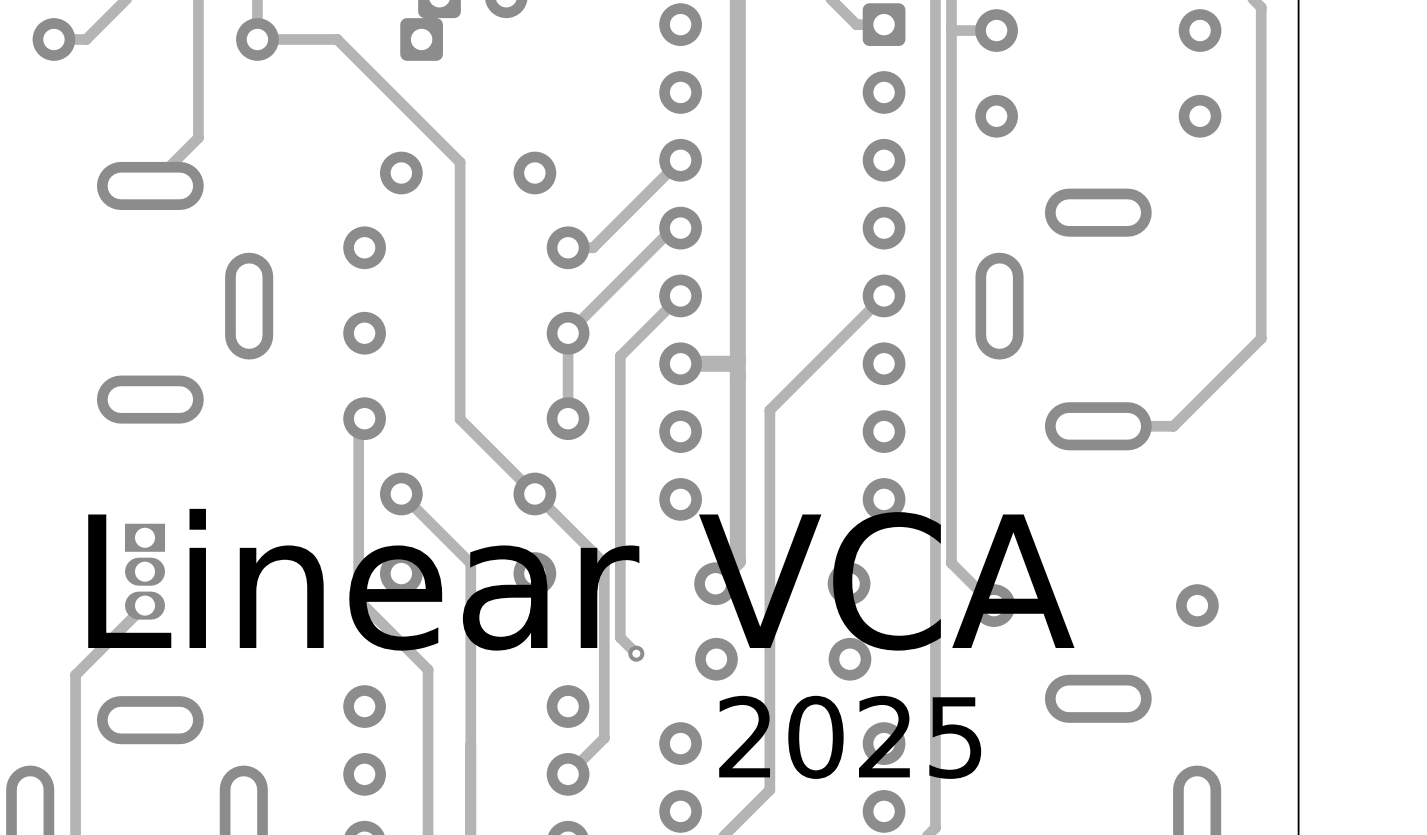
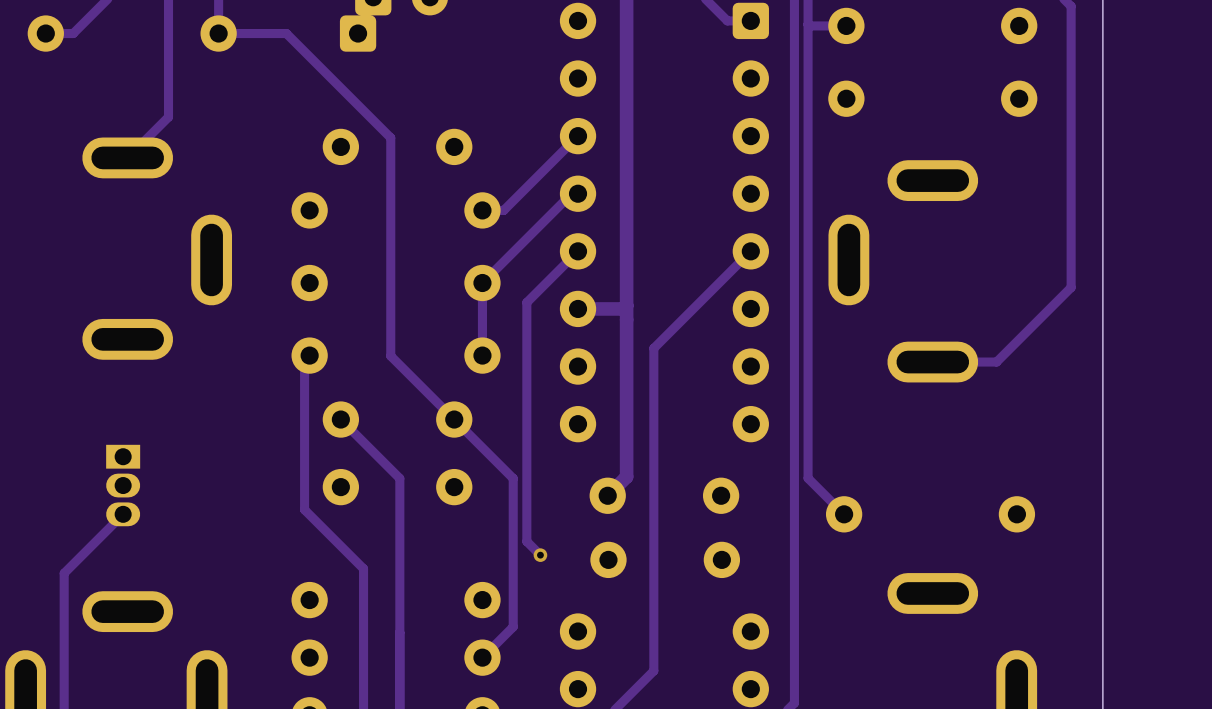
text: Linear VCA (581, 579) -> none
text: 2025 (850, 737) -> none

